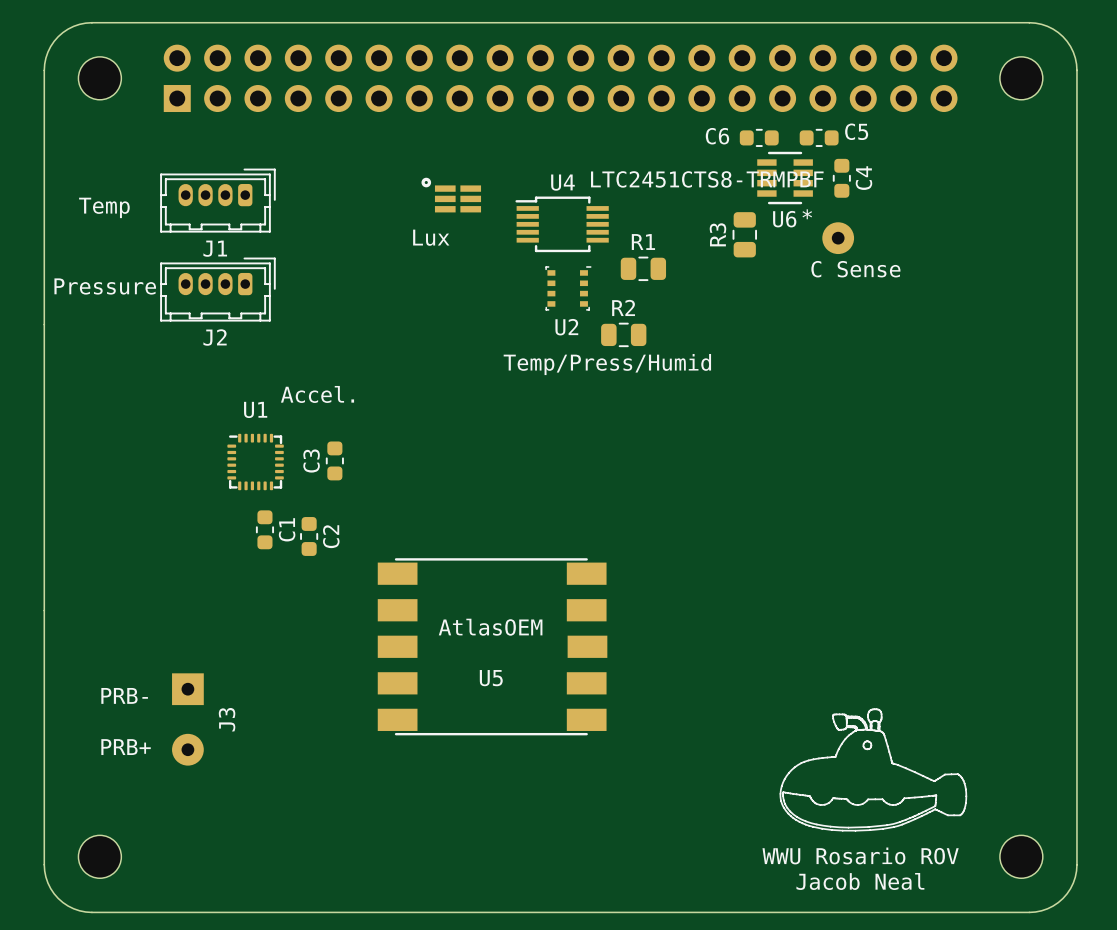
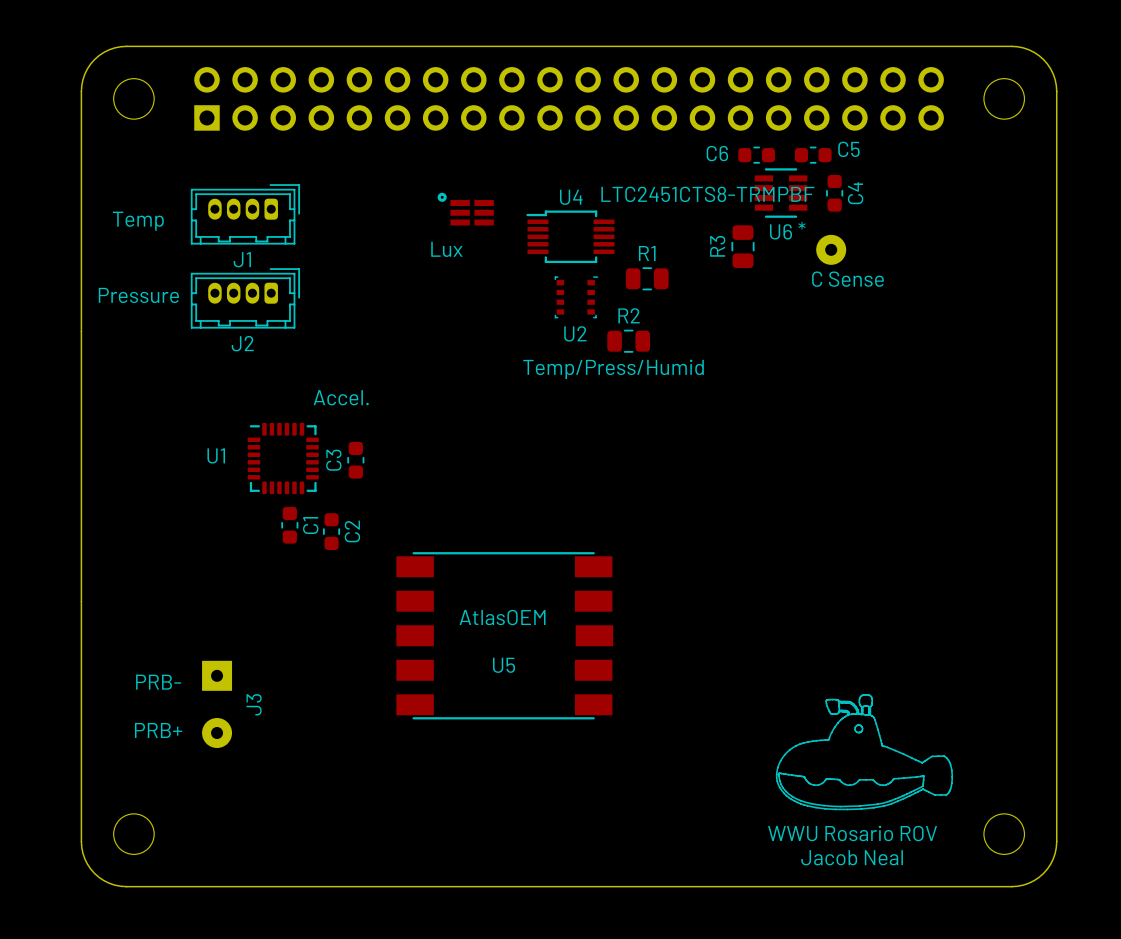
U1 name position: U1 (255, 409) -> U1 (216, 455)
U1 footprint: [227, 433, 284, 491] -> [247, 422, 319, 495]

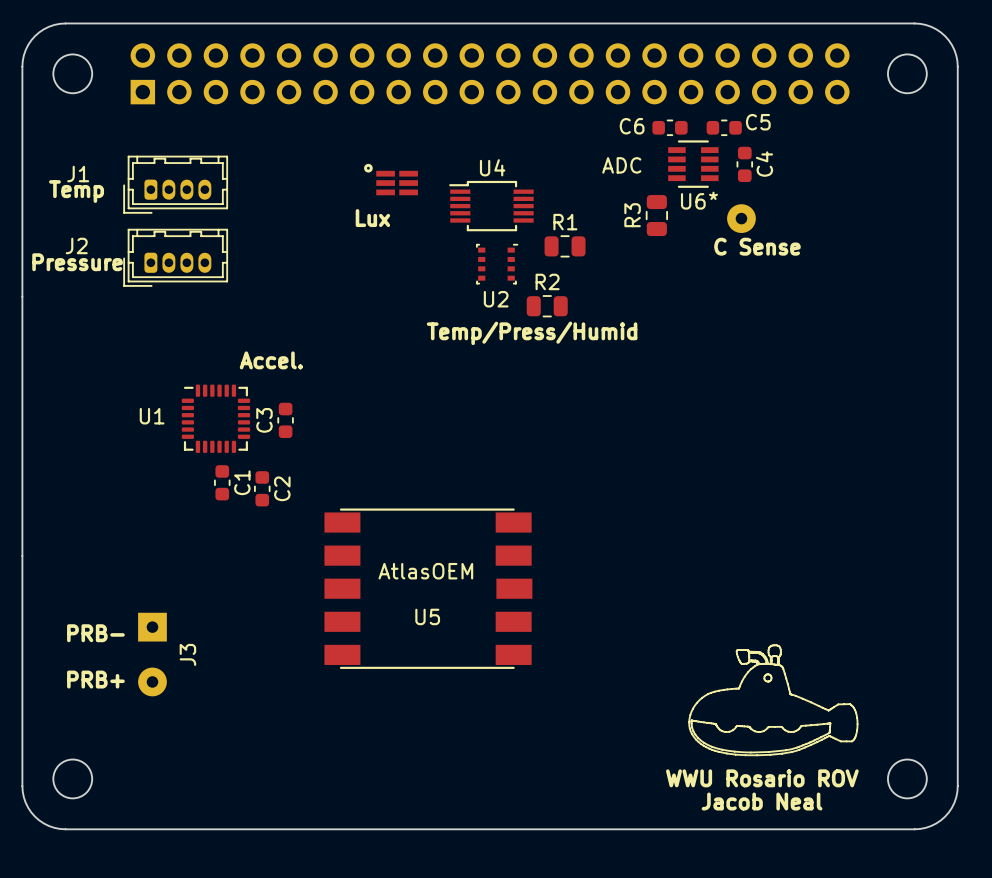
U6 value: LTC2451CTS8-TRMPBF (707, 194) -> ADC (621, 165)
J1 rotation: 0° (245, 214) -> 180° (175, 184)
J1 name position: J1 (242, 259) -> J1 (78, 174)
J2 rotation: 0° (245, 298) -> 180° (175, 257)
J2 name position: J2 (242, 343) -> J2 (76, 245)

